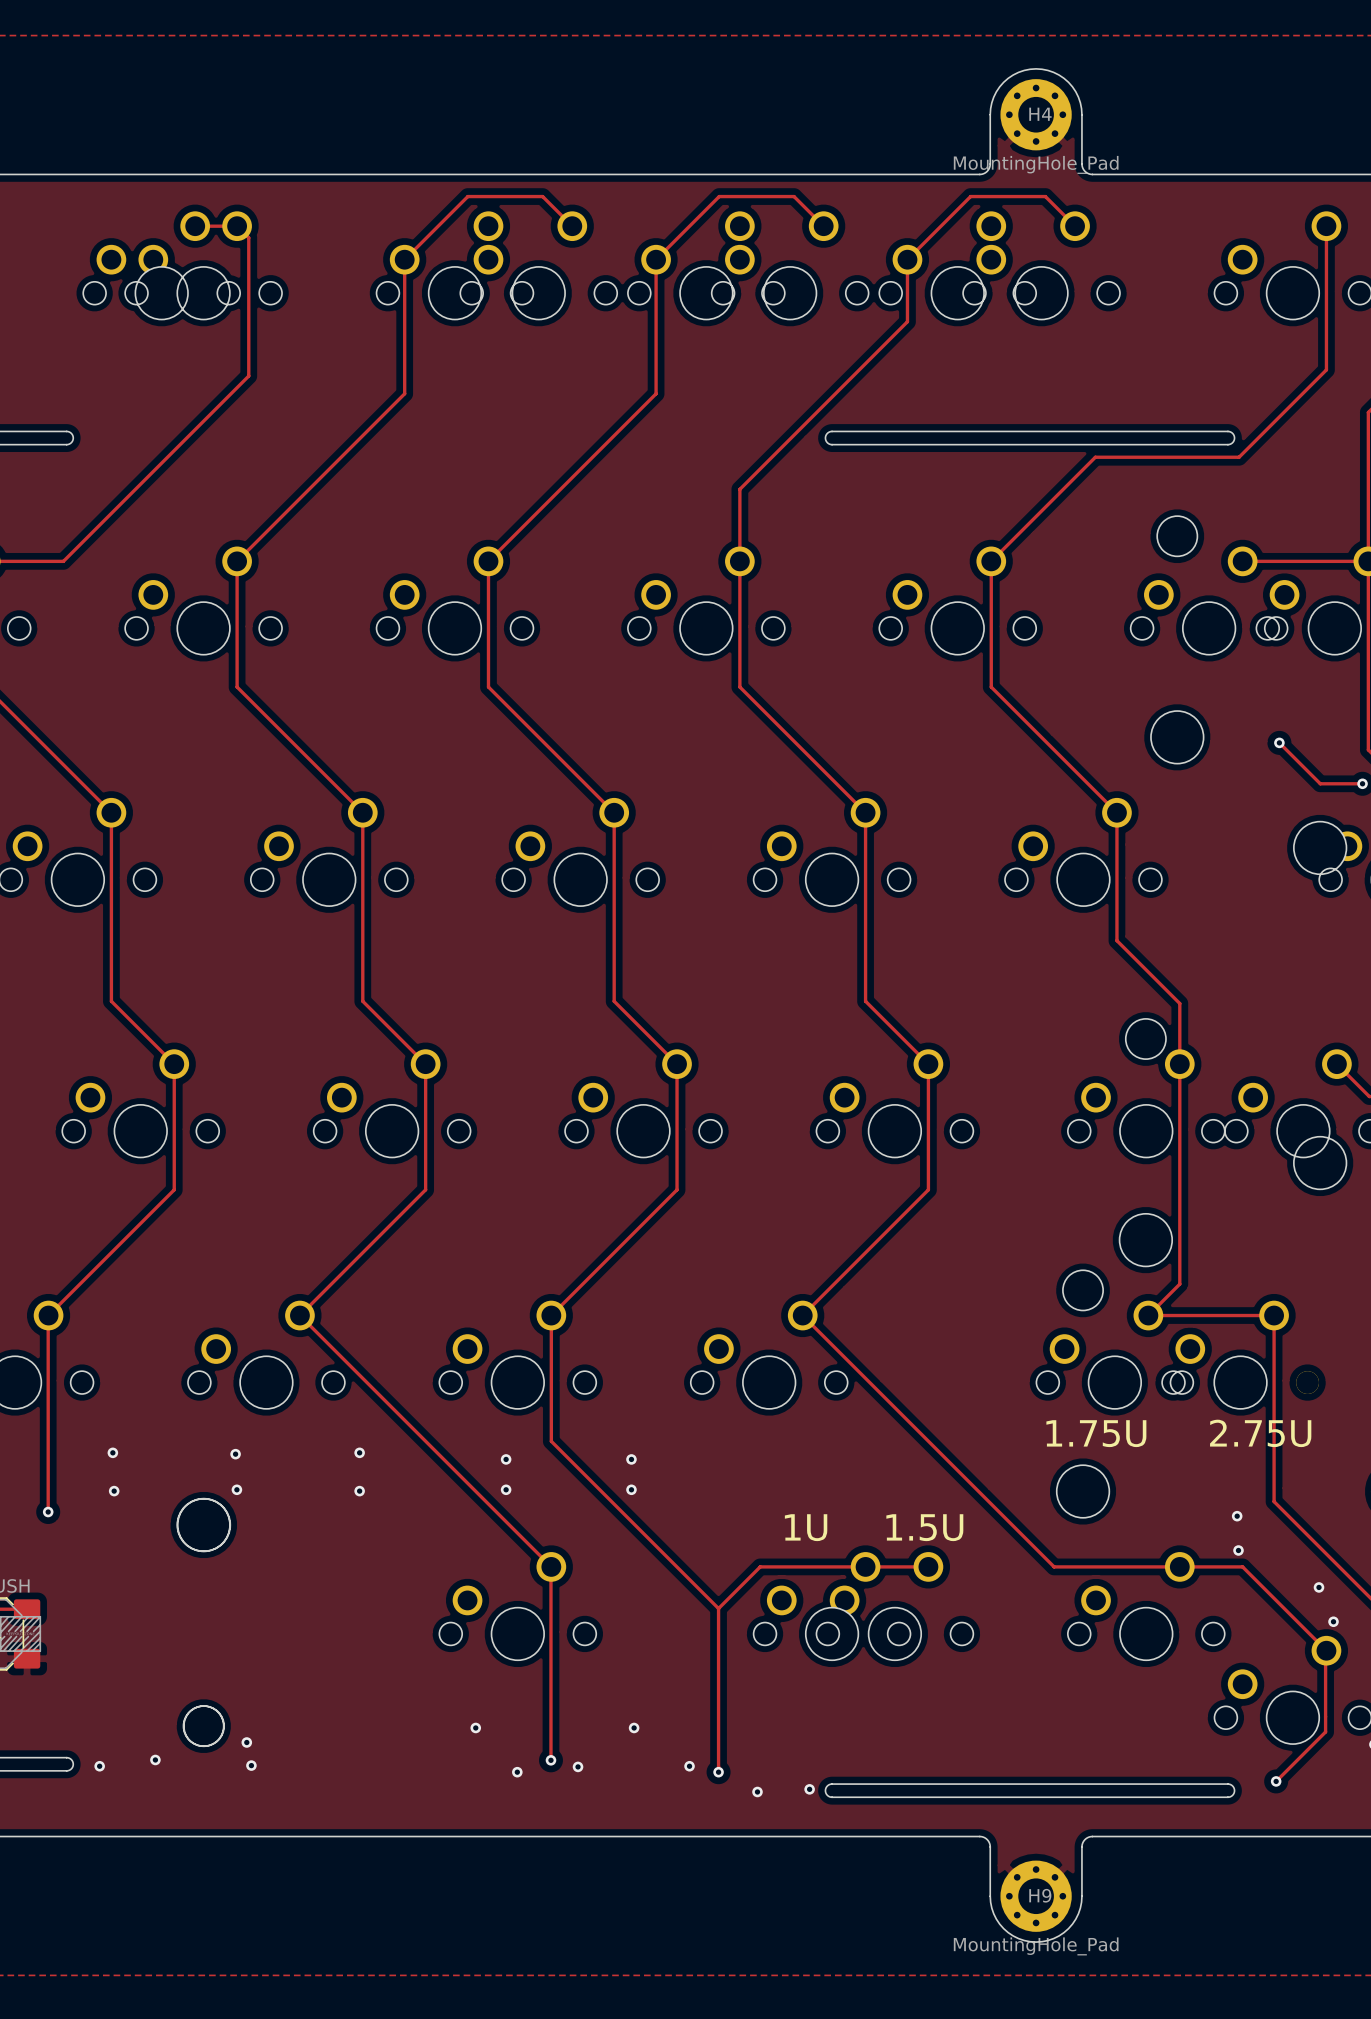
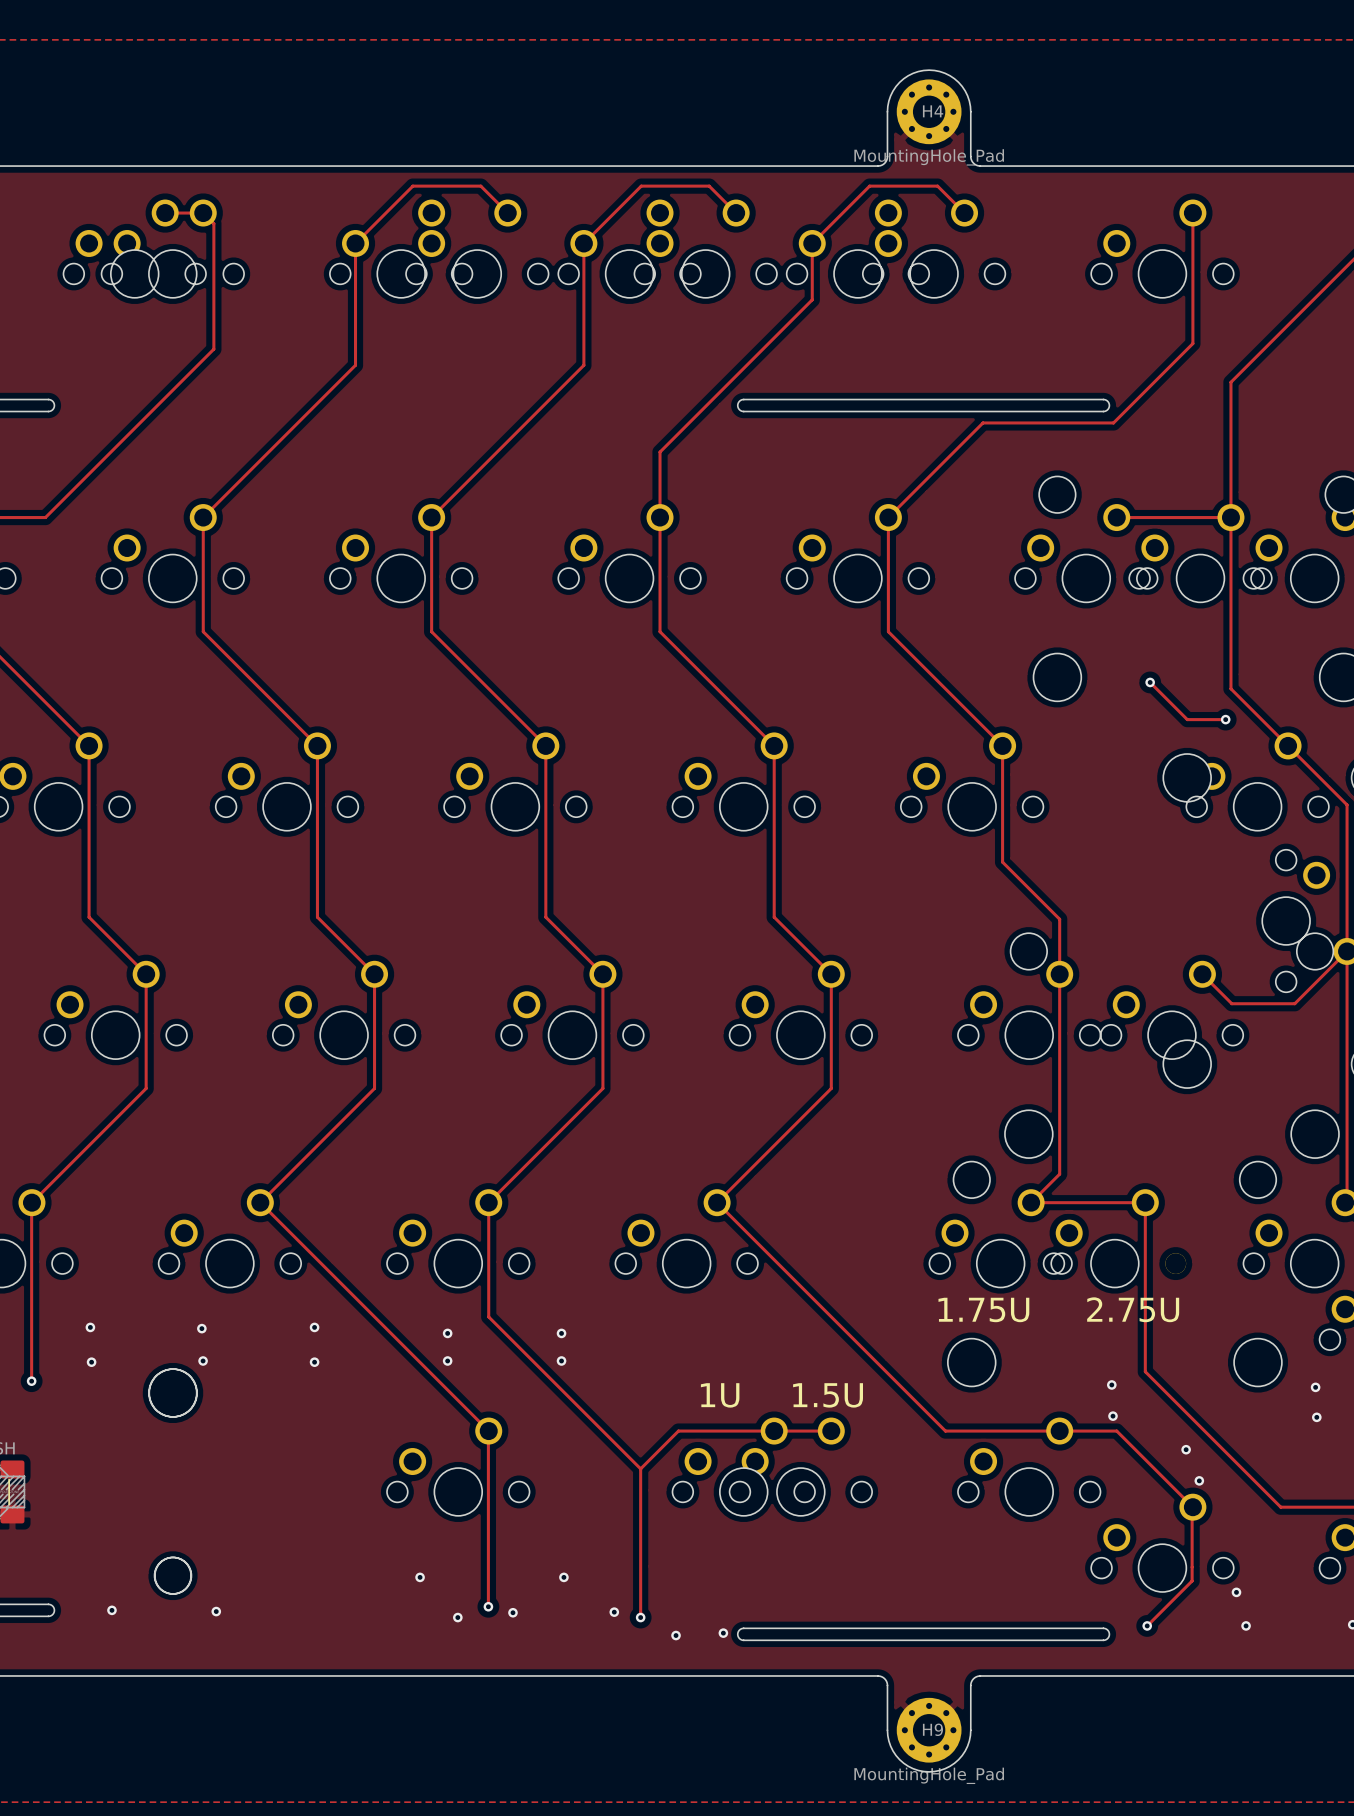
via: (246, 1742) -> none
via: (155, 1759) -> none
via: none -> (111, 1610)
via: (99, 1766) -> none

